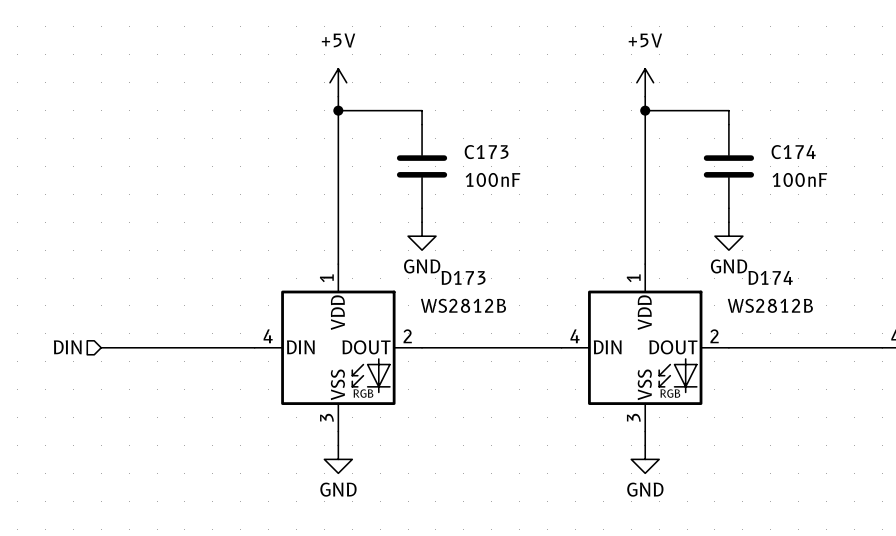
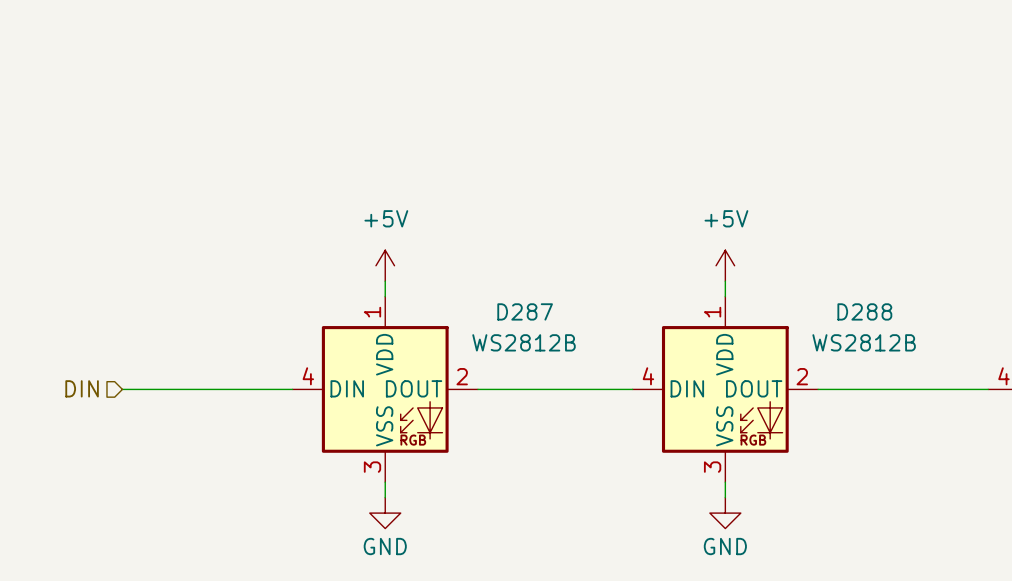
power symbol position: +5V (338, 82) -> +5V (385, 265)
power symbol position: +5V (645, 82) -> +5V (725, 265)
wire: (338, 96) (338, 250) -> none
wire: (645, 96) (645, 250) -> none
wire: (338, 110) (422, 110) (422, 124) -> none
junction: (338, 110) -> none
wire: (645, 110) (728, 110) (728, 124) -> none
junction: (645, 110) -> none
C173: 100nF (422, 166) -> none
C174: 100nF (728, 166) -> none
wire: (422, 208) (422, 222) -> none
wire: (728, 208) (728, 222) -> none
power symbol: GND (422, 236) -> none
power symbol: GND (728, 236) -> none
D173 name: D173 (463, 277) -> D287 (525, 311)
D174 name: D174 (770, 277) -> D288 (864, 311)

